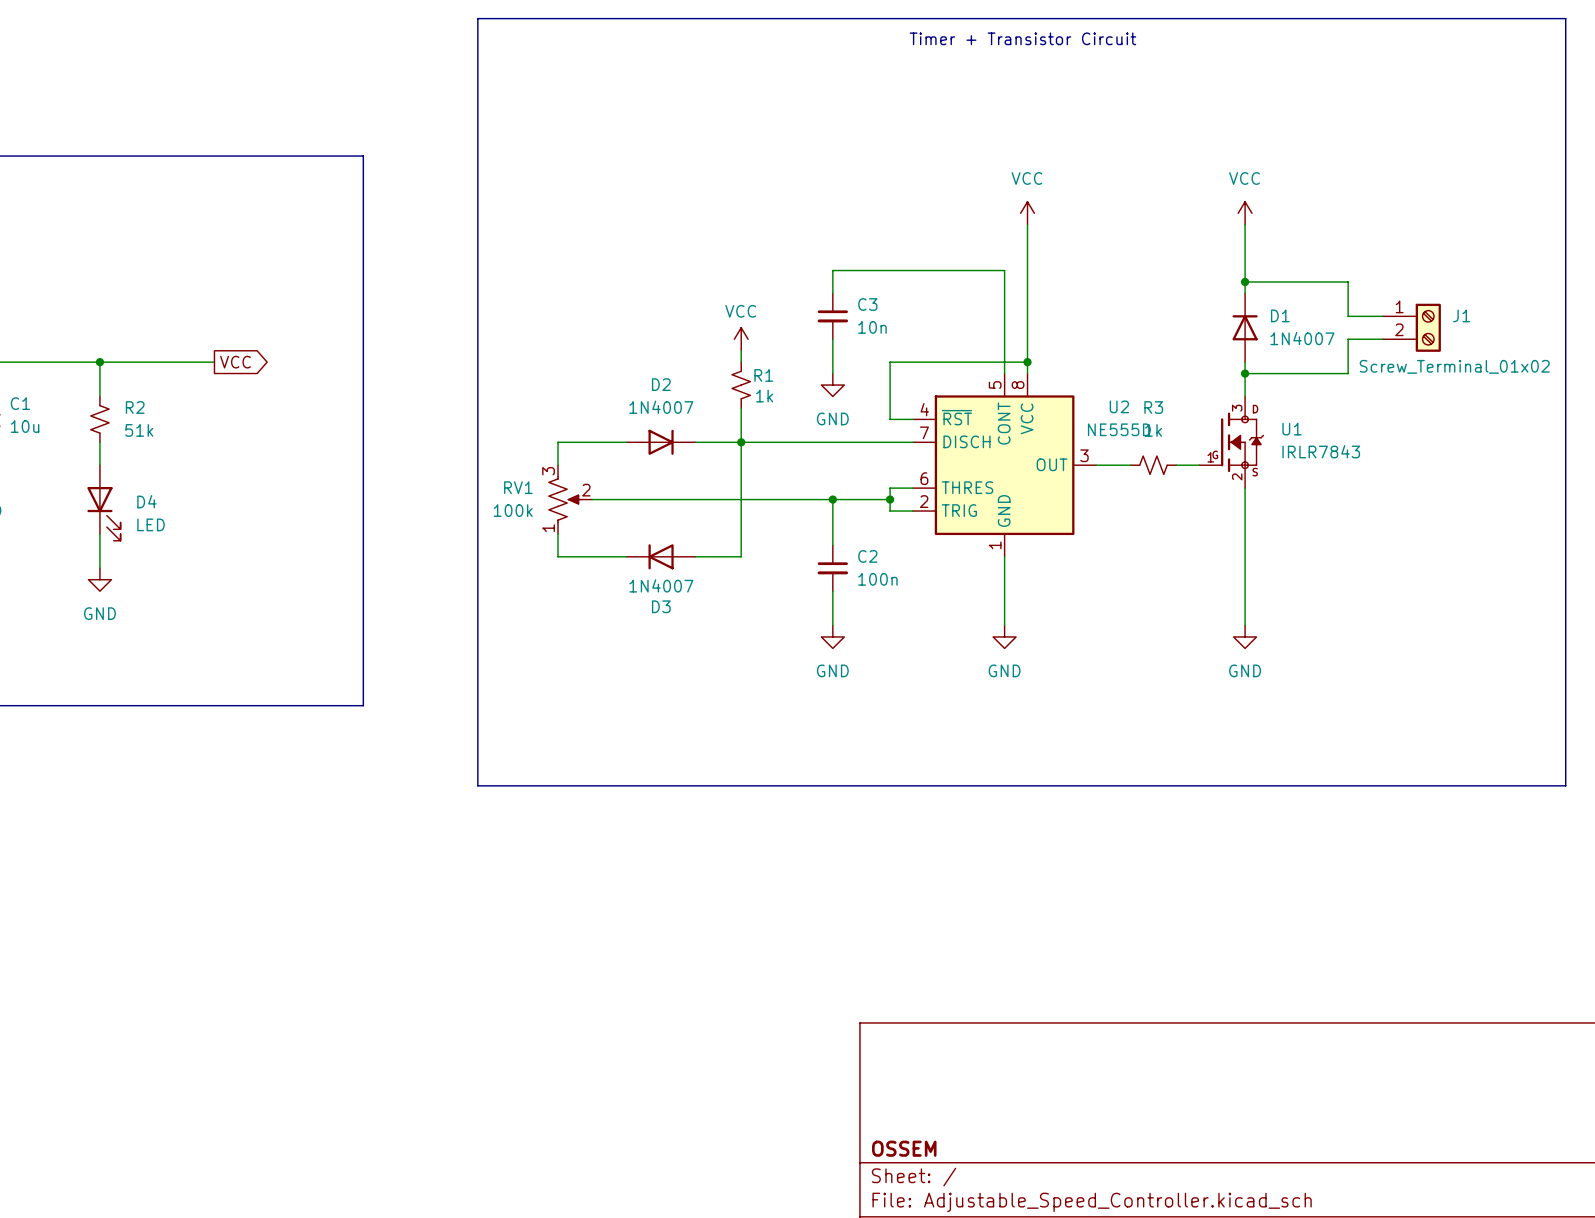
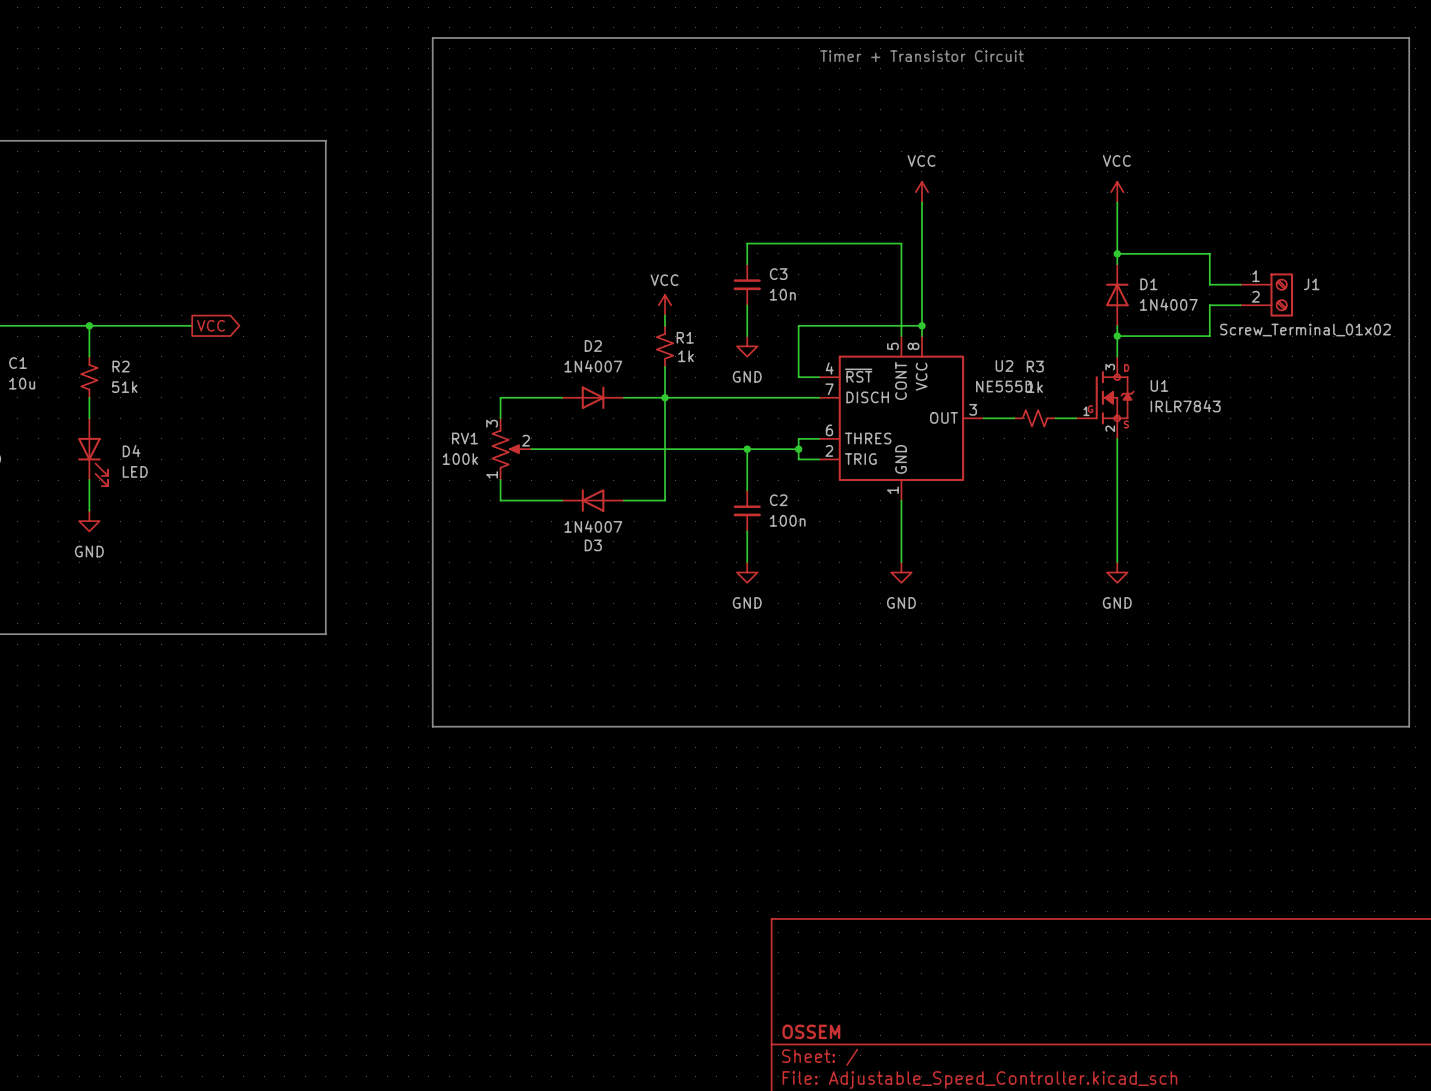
line: (477, 18) (1565, 18) (1565, 785) (477, 785) (477, 18) -> (432, 38) (1409, 38) (1409, 726) (432, 726) (432, 38)
text position: Timer + Transistor Circuit (1022, 38) -> Timer + Transistor Circuit (921, 56)

